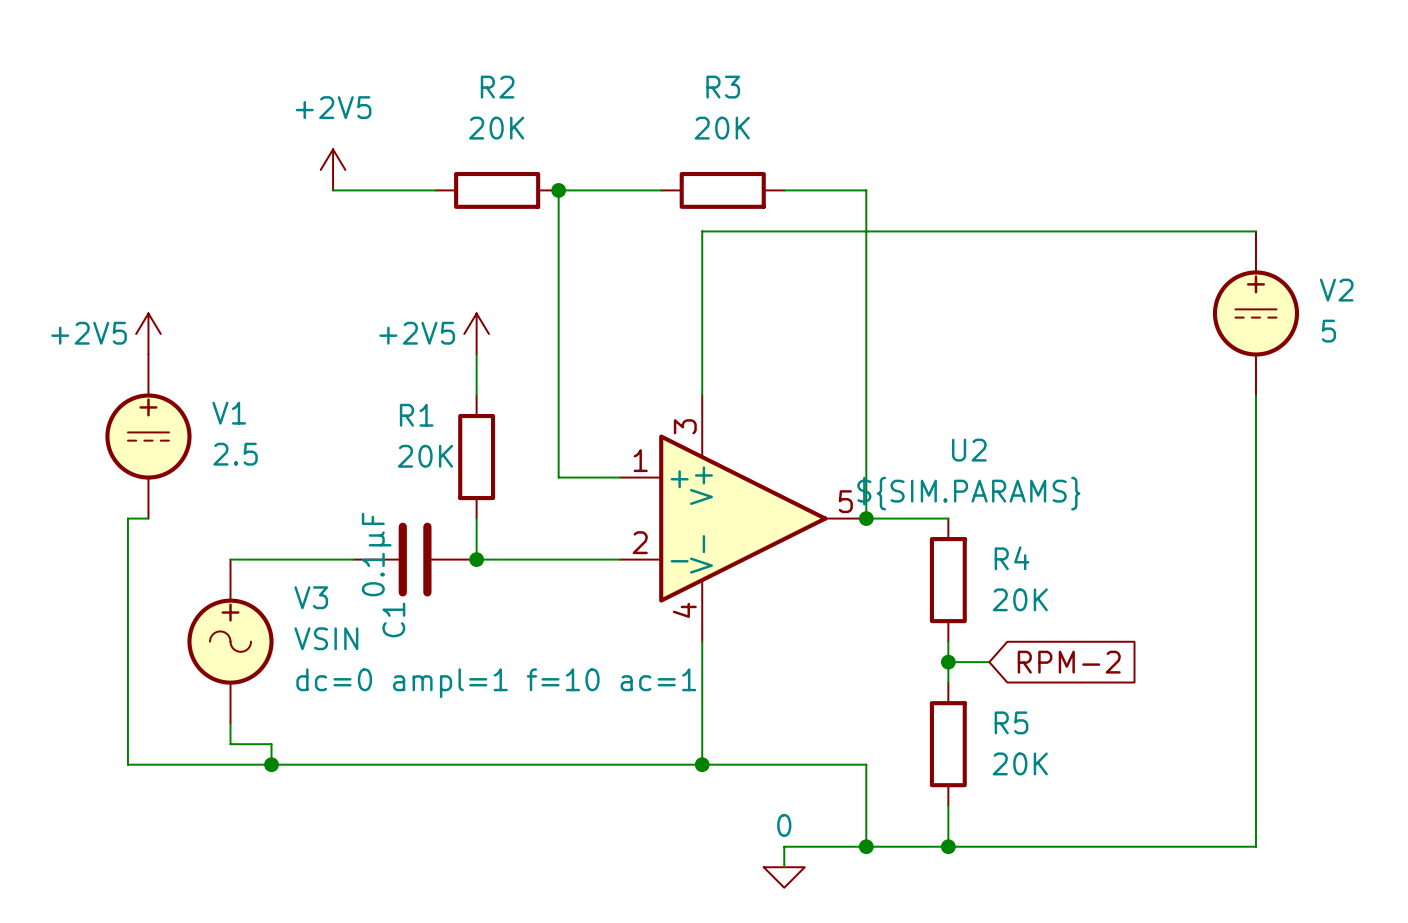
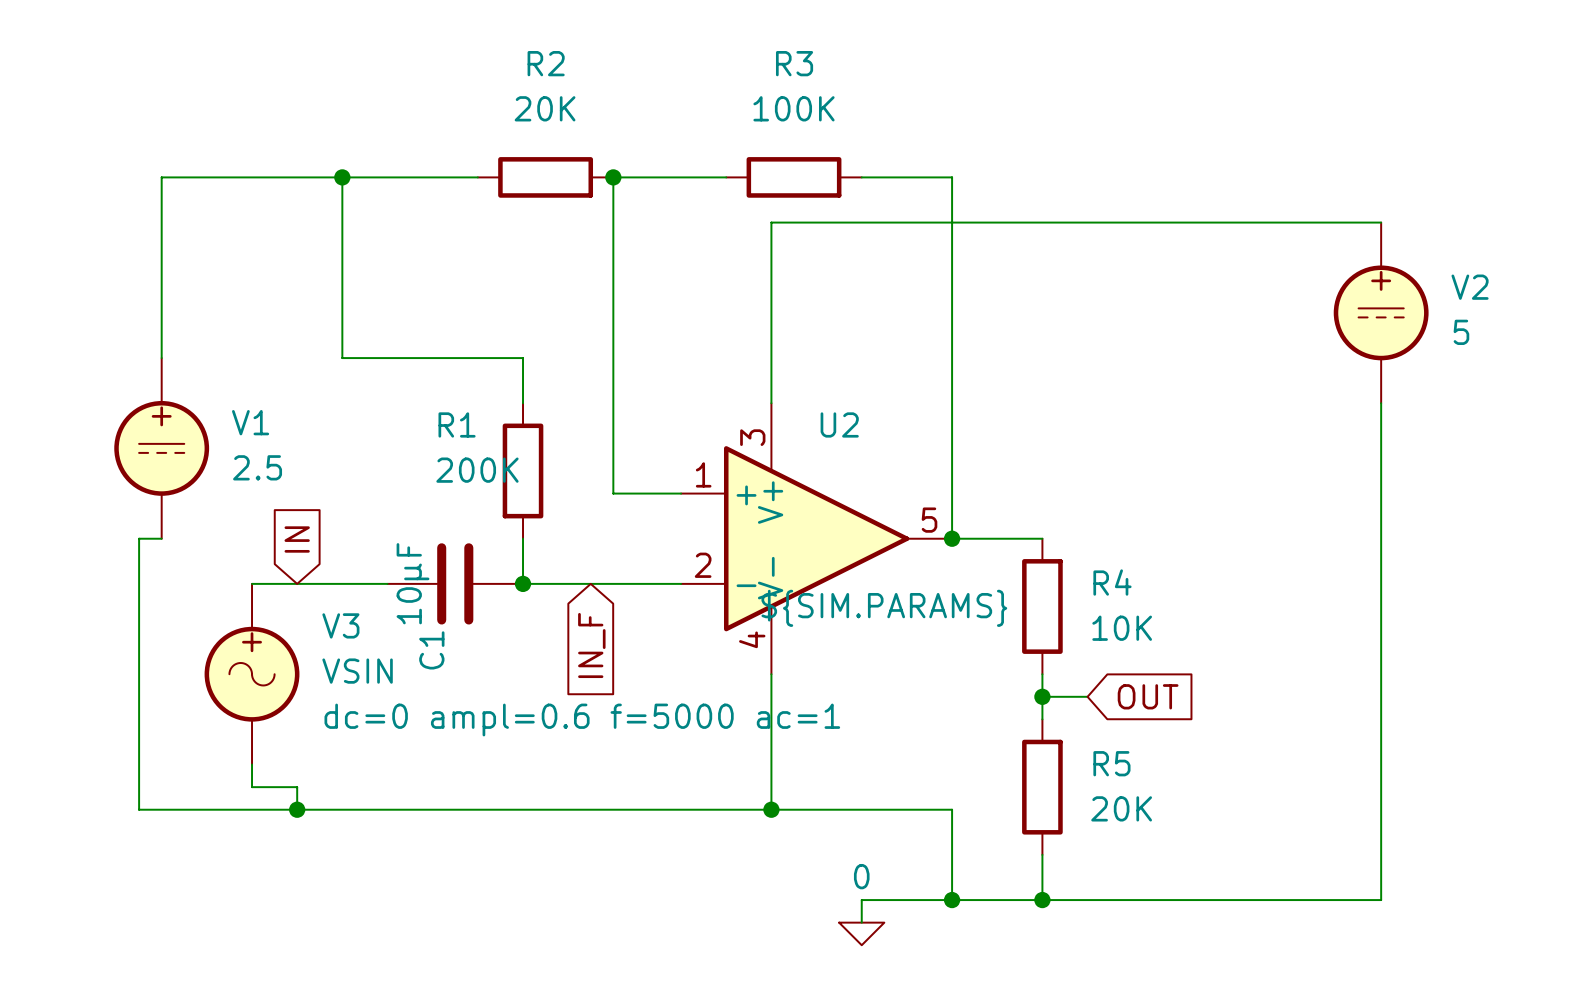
R3 value: 20K (722, 128) -> 100K (794, 108)
power symbol: +2V5 (333, 169) -> none
wire: none -> (342, 177) (342, 358) (523, 358)
junction: none -> (342, 177)
wire: none -> (364, 177) (161, 177) (161, 358)
power symbol: +2V5 (148, 333) -> none
power symbol: +2V5 (476, 333) -> none
U2 name position: U2 (969, 450) -> U2 (839, 424)
R1 value: 20K (425, 456) -> 200K (477, 470)
U2 value position: ${SIM.PARAMS} (968, 493) -> ${SIM.PARAMS} (884, 608)
global label: none -> IN (297, 539)
C1 value: 0.1µF (376, 554) -> 10µF (413, 583)
R4 value: 20K (1020, 599) -> 10K (1122, 628)
global label: none -> IN_F (591, 645)
global label: RPM-2 (1069, 662) -> OUT (1148, 696)
V3 text: dc=0 ampl=1 f=10 ac=1 (496, 683) -> dc=0 ampl=0.6 f=5000 ac=1 (582, 720)

